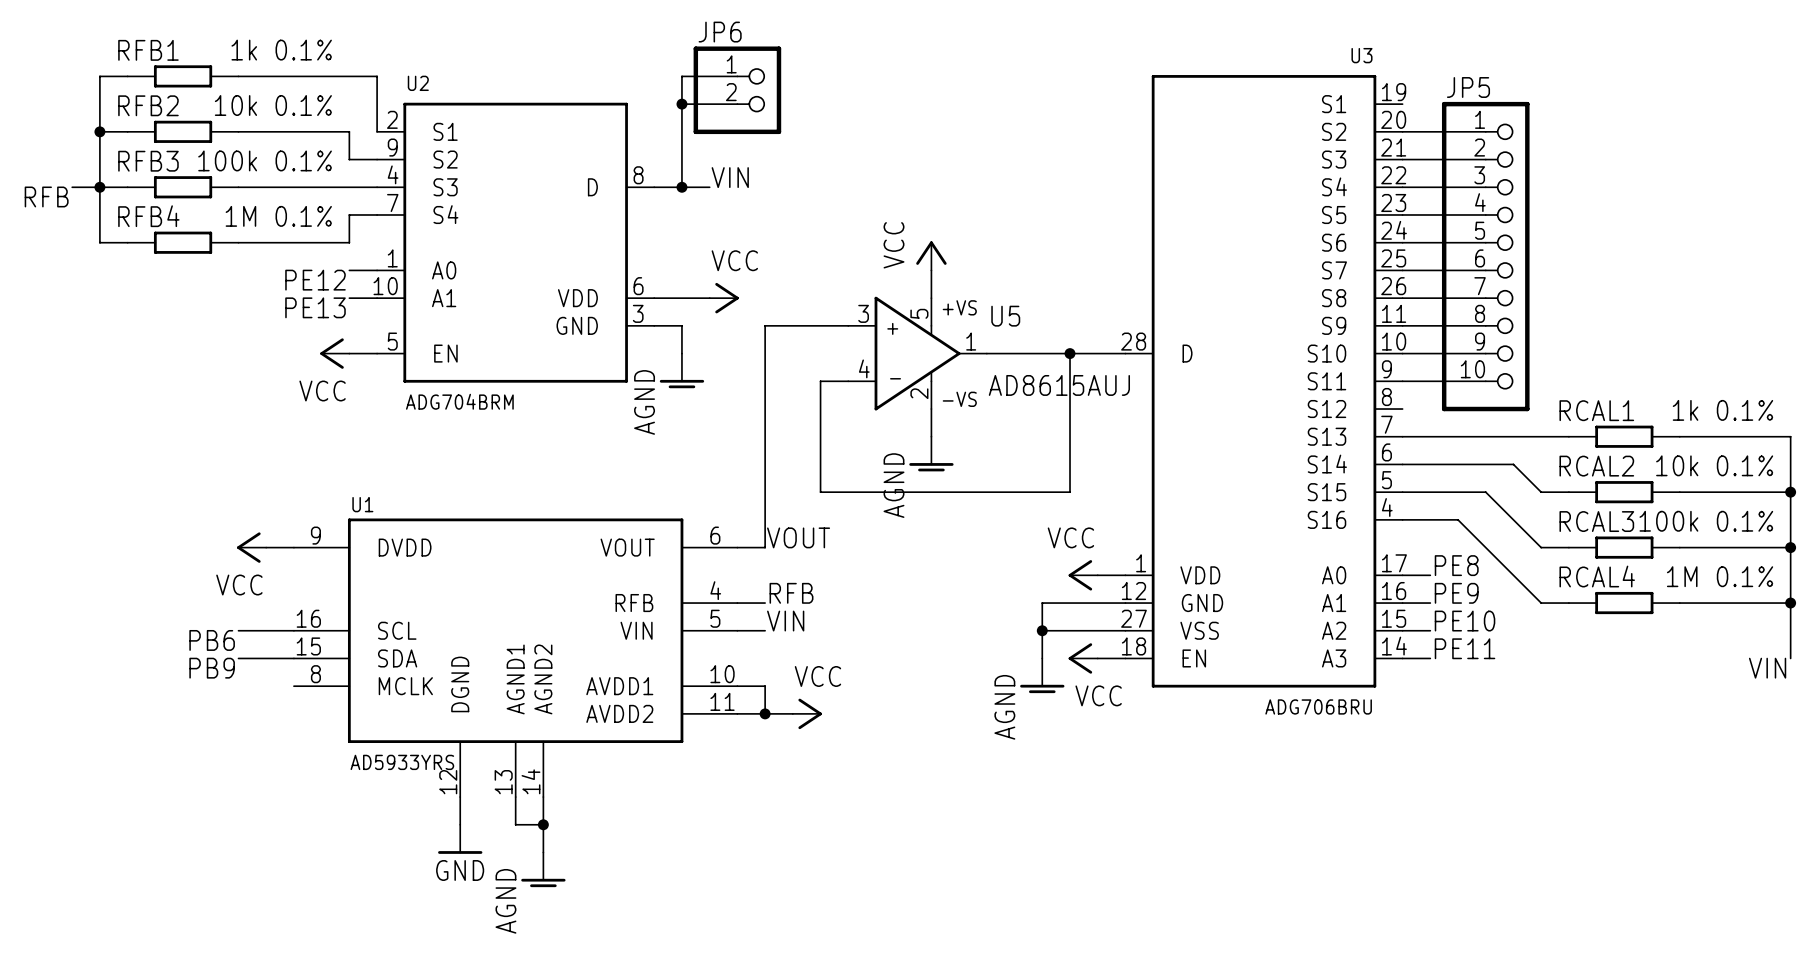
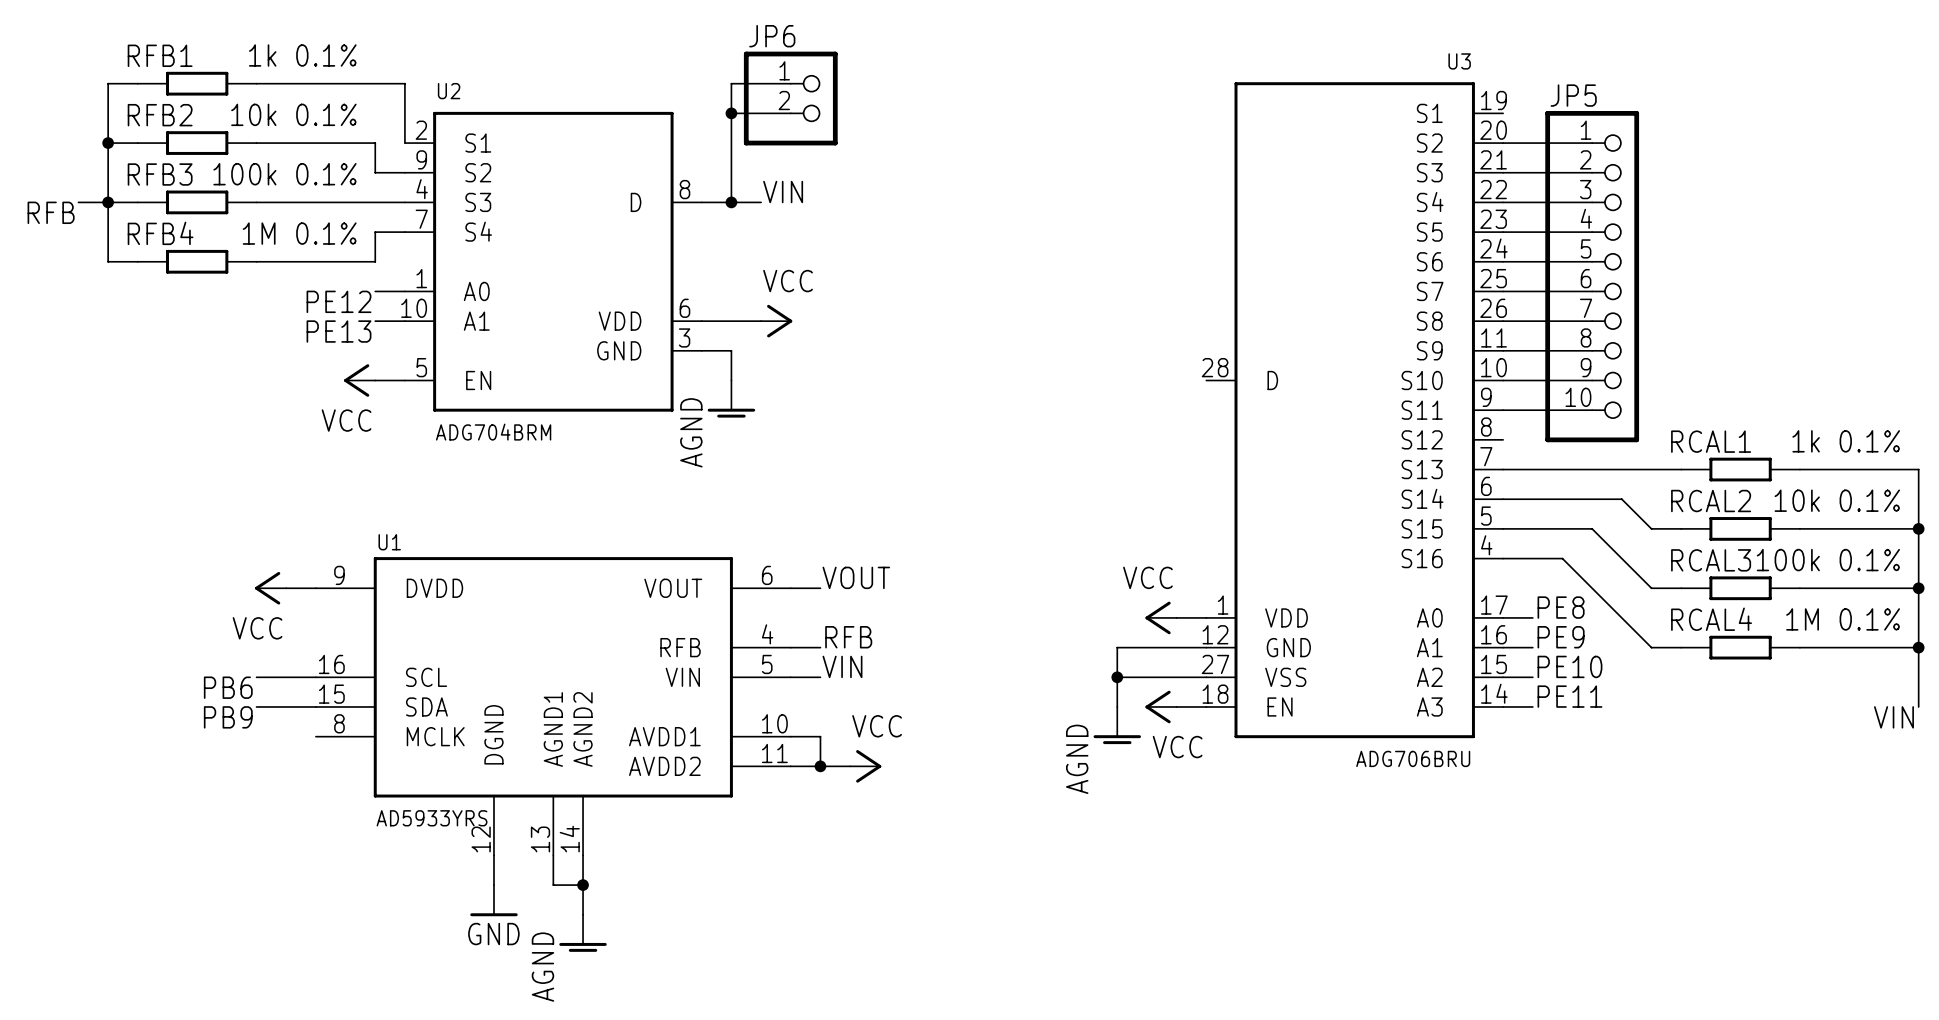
power symbol: VCC (931, 255) -> none
wire: (931, 270) (931, 298) -> none
wire: (848, 325) (765, 325) (765, 547) -> none
U5: AD8615AUJ (917, 353) -> none
wire: (986, 353) (1125, 353) -> none
wire: (1070, 353) (1070, 492) (820, 492) (820, 381) (848, 381) -> none
junction: (1070, 353) -> none
wire: (931, 409) (931, 436) -> none
power symbol: AGND (931, 454) -> none

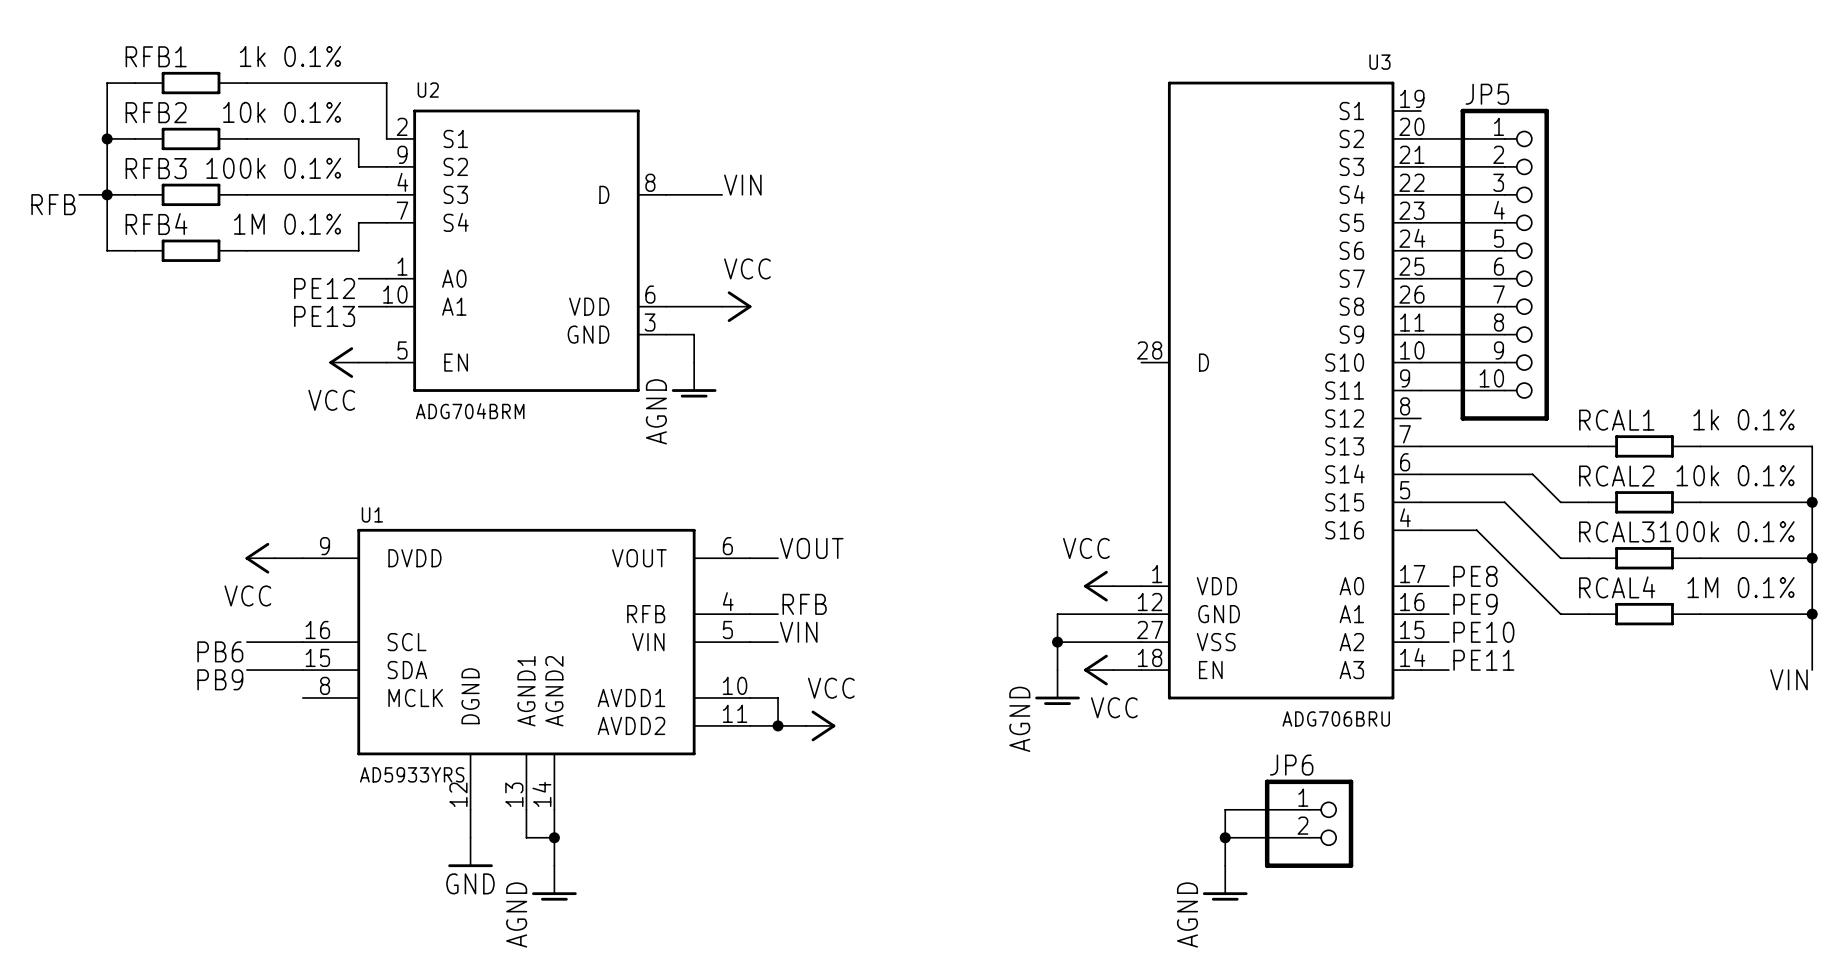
wire: (790, 83) (731, 83) (731, 202) -> none
JP6 position: (790, 98) -> (1309, 823)
wire: (731, 113) (790, 113) -> none
junction: (731, 113) -> none
junction: (731, 202) -> none
wire: none -> (1309, 809) (1225, 809) (1225, 865)
wire: none -> (1225, 837) (1309, 837)
junction: none -> (1225, 837)
power symbol: none -> AGND (1225, 883)

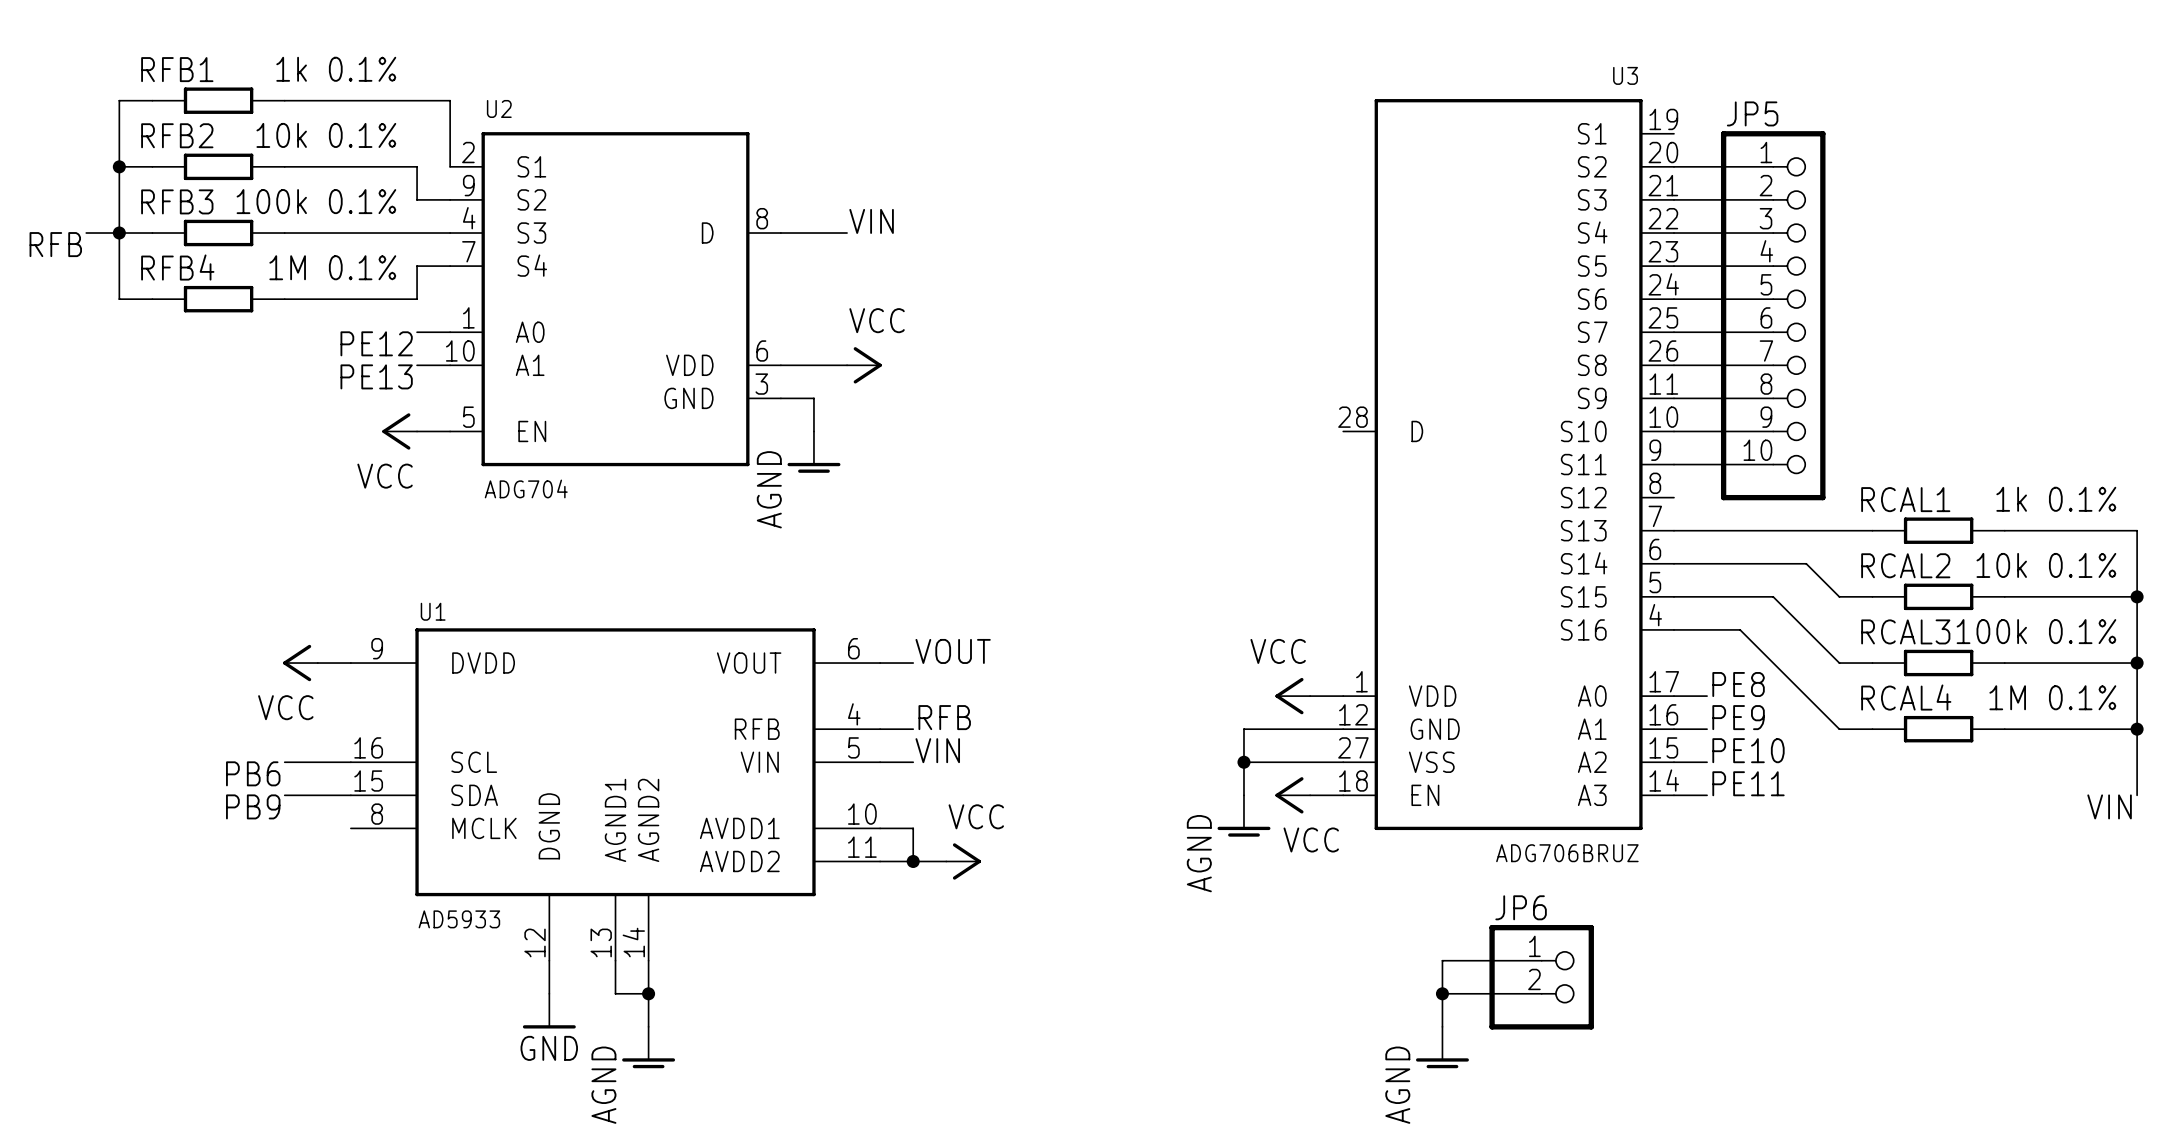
U2 value: ADG704BRM (470, 411) -> ADG704 (526, 488)
U3 value: ADG706BRU (1336, 718) -> ADG706BRUZ (1567, 853)
U1 value: AD5933YRS (412, 774) -> AD5933 (459, 919)

